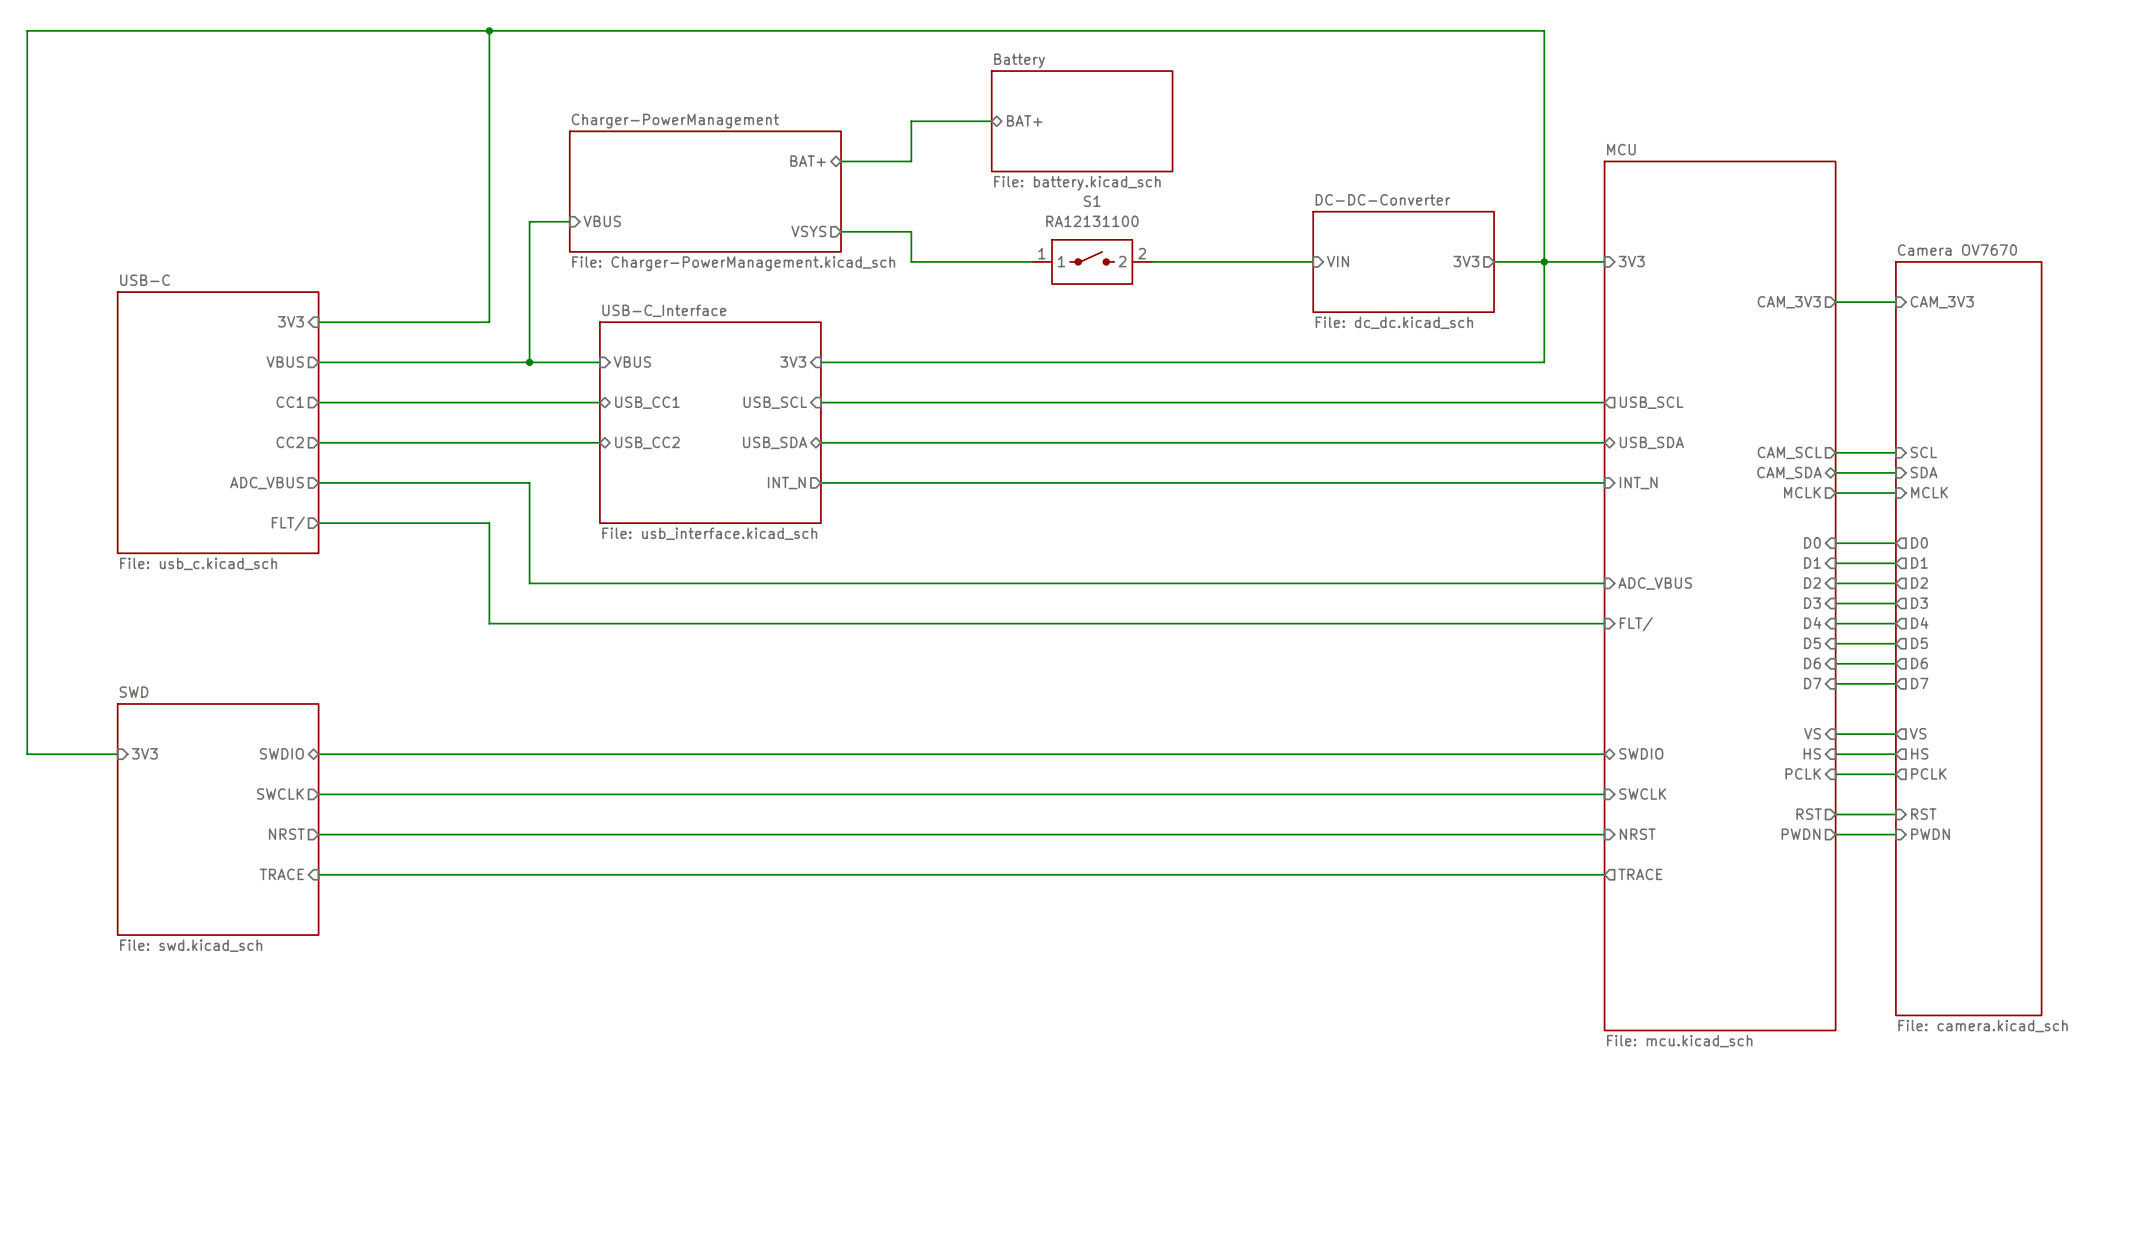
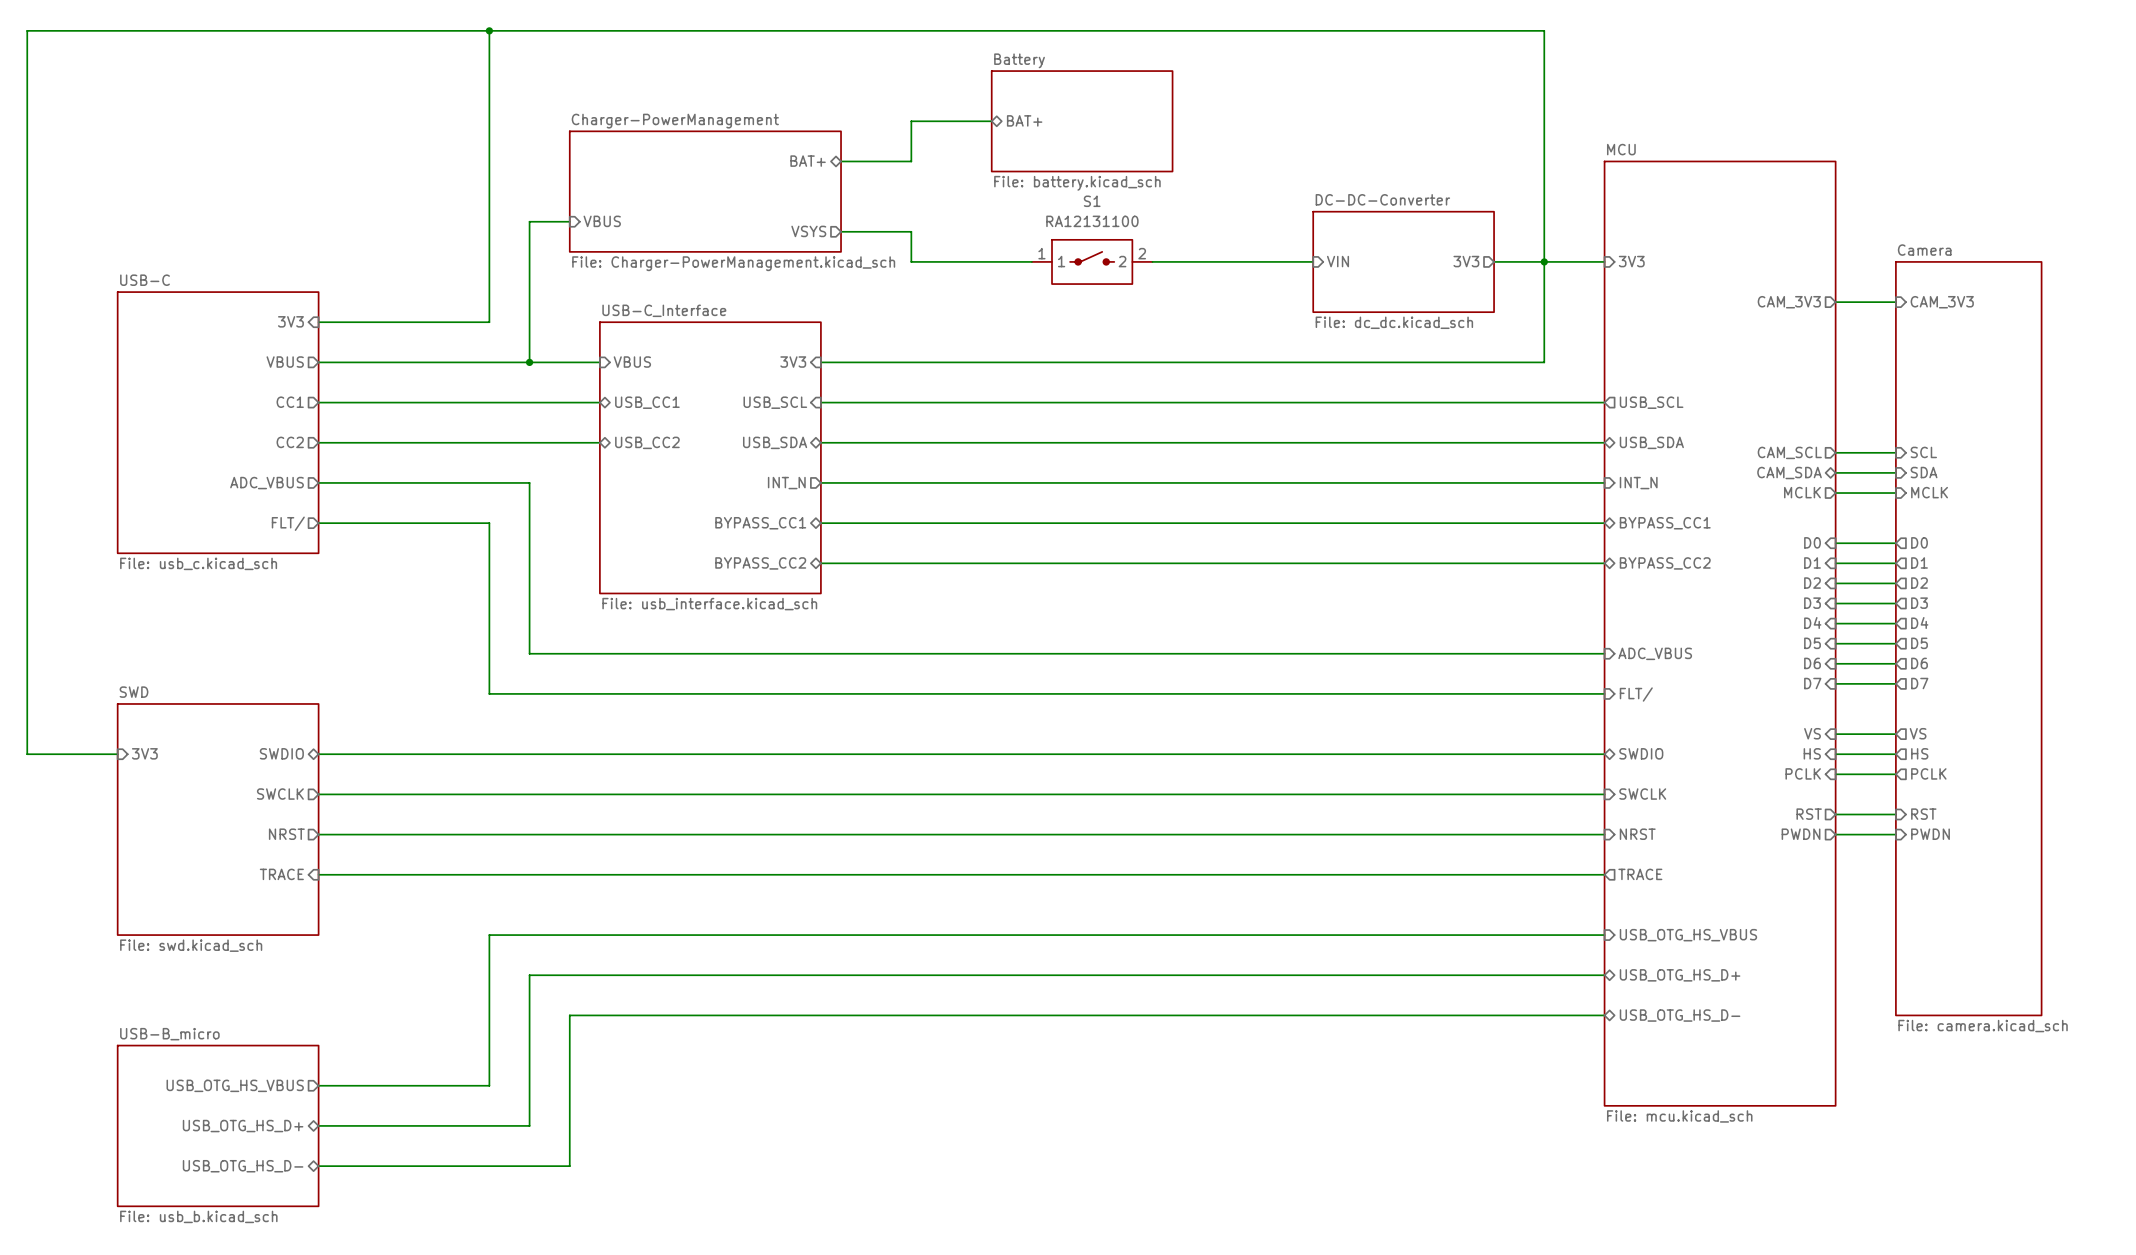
sheet Camera OV7670 name: Camera OV7670 (1957, 250) -> Camera (1924, 250)
sheet USB-C_Interface: File: usb_interface.kicad_sch (710, 422) -> none
sheet USB-C_Interface: none -> File: usb_interface.kicad_sch (710, 457)
sheet pin: none -> BYPASS_CC1 (760, 523)
wire: none -> (820, 523) (1604, 523)
sheet pin: none -> BYPASS_CC1 (1665, 523)
sheet pin: none -> BYPASS_CC2 (760, 563)
wire: none -> (820, 563) (1604, 563)
sheet pin: none -> BYPASS_CC2 (1665, 563)
wire: (529, 583) (1604, 583) -> (529, 583) (529, 653) (1604, 653)
sheet pin position: ADC_VBUS (1655, 583) -> ADC_VBUS (1655, 653)
sheet MCU: File: mcu.kicad_sch (1720, 595) -> none
wire: (489, 623) (1604, 623) -> (489, 623) (489, 693) (1604, 693)
sheet pin position: FLT/ (1636, 624) -> FLT/ (1636, 694)
sheet MCU: none -> File: mcu.kicad_sch (1720, 633)
wire: none -> (1604, 935) (489, 935) (489, 1085) (318, 1085)
sheet pin: none -> USB_OTG_HS_VBUS (1688, 935)
wire: none -> (1604, 975) (529, 975) (529, 1125) (318, 1125)
sheet pin: none -> USB_OTG_HS_D+ (1680, 975)
wire: none -> (1604, 1015) (569, 1015) (569, 1166) (318, 1166)
sheet pin: none -> USB_OTG_HS_D- (1680, 1015)
sheet pin: none -> USB_OTG_HS_VBUS (235, 1085)
sheet USB-B_micro: none -> File: usb_b.kicad_sch (218, 1125)
sheet pin: none -> USB_OTG_HS_D+ (243, 1126)
sheet pin: none -> USB_OTG_HS_D- (243, 1166)

